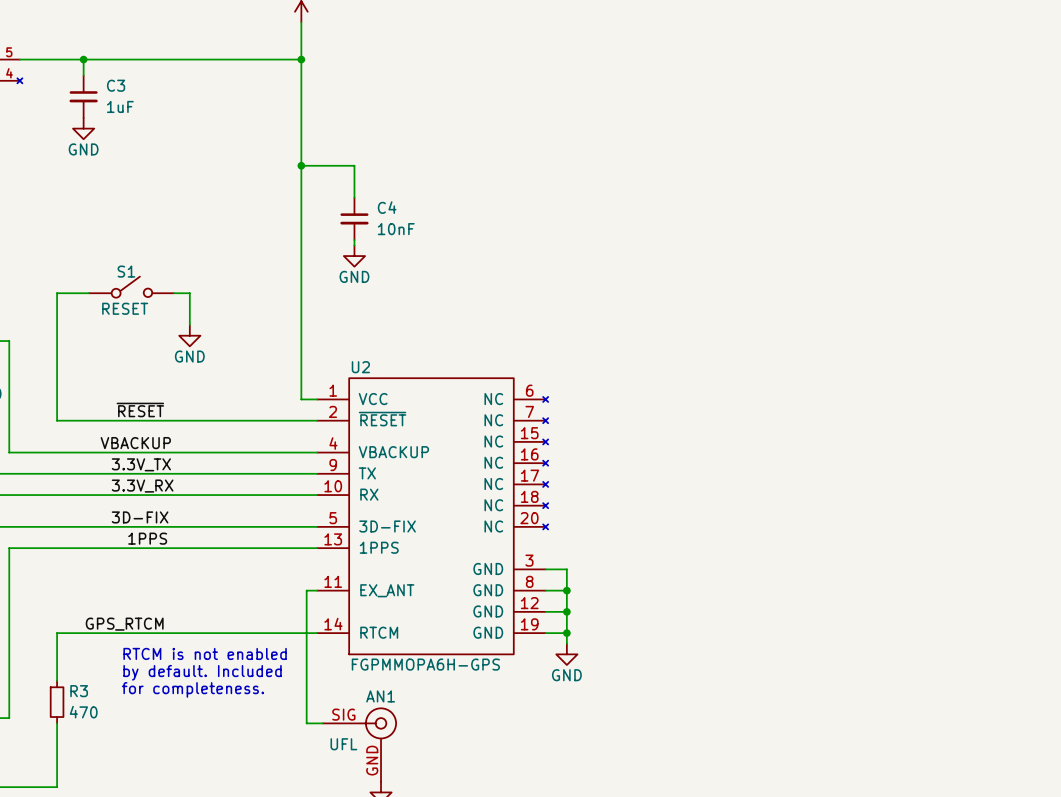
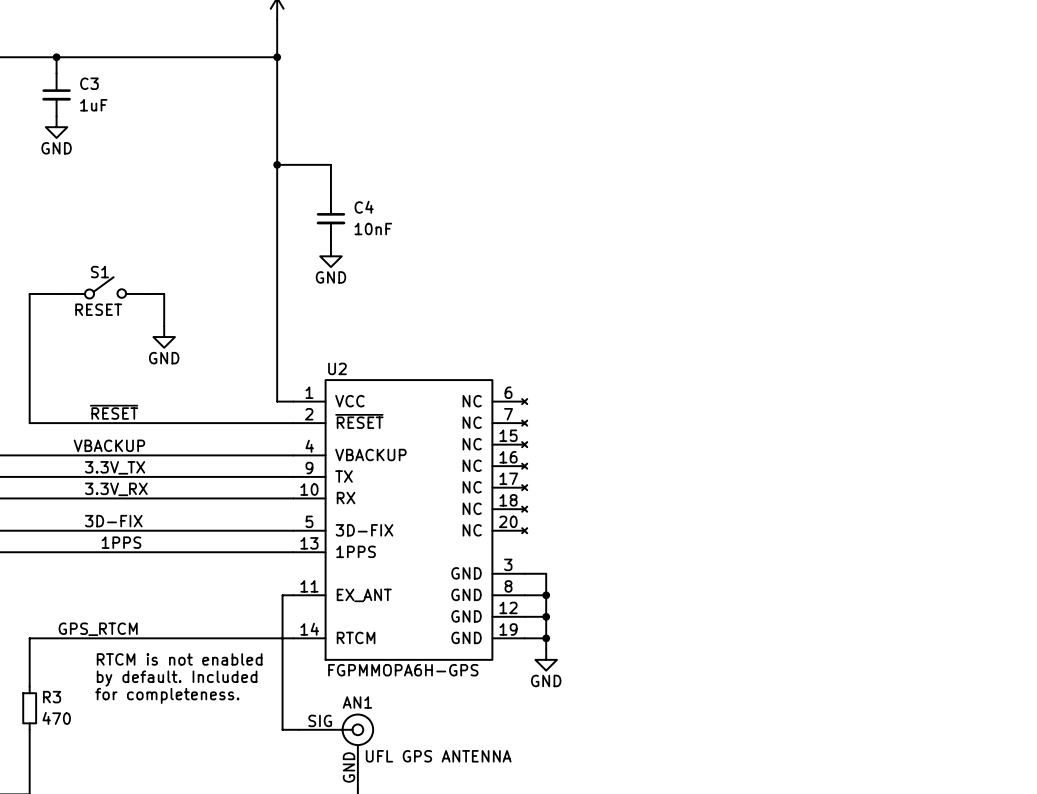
AN1 value: UFL (343, 744) -> UFL GPS ANTENNA (438, 756)

